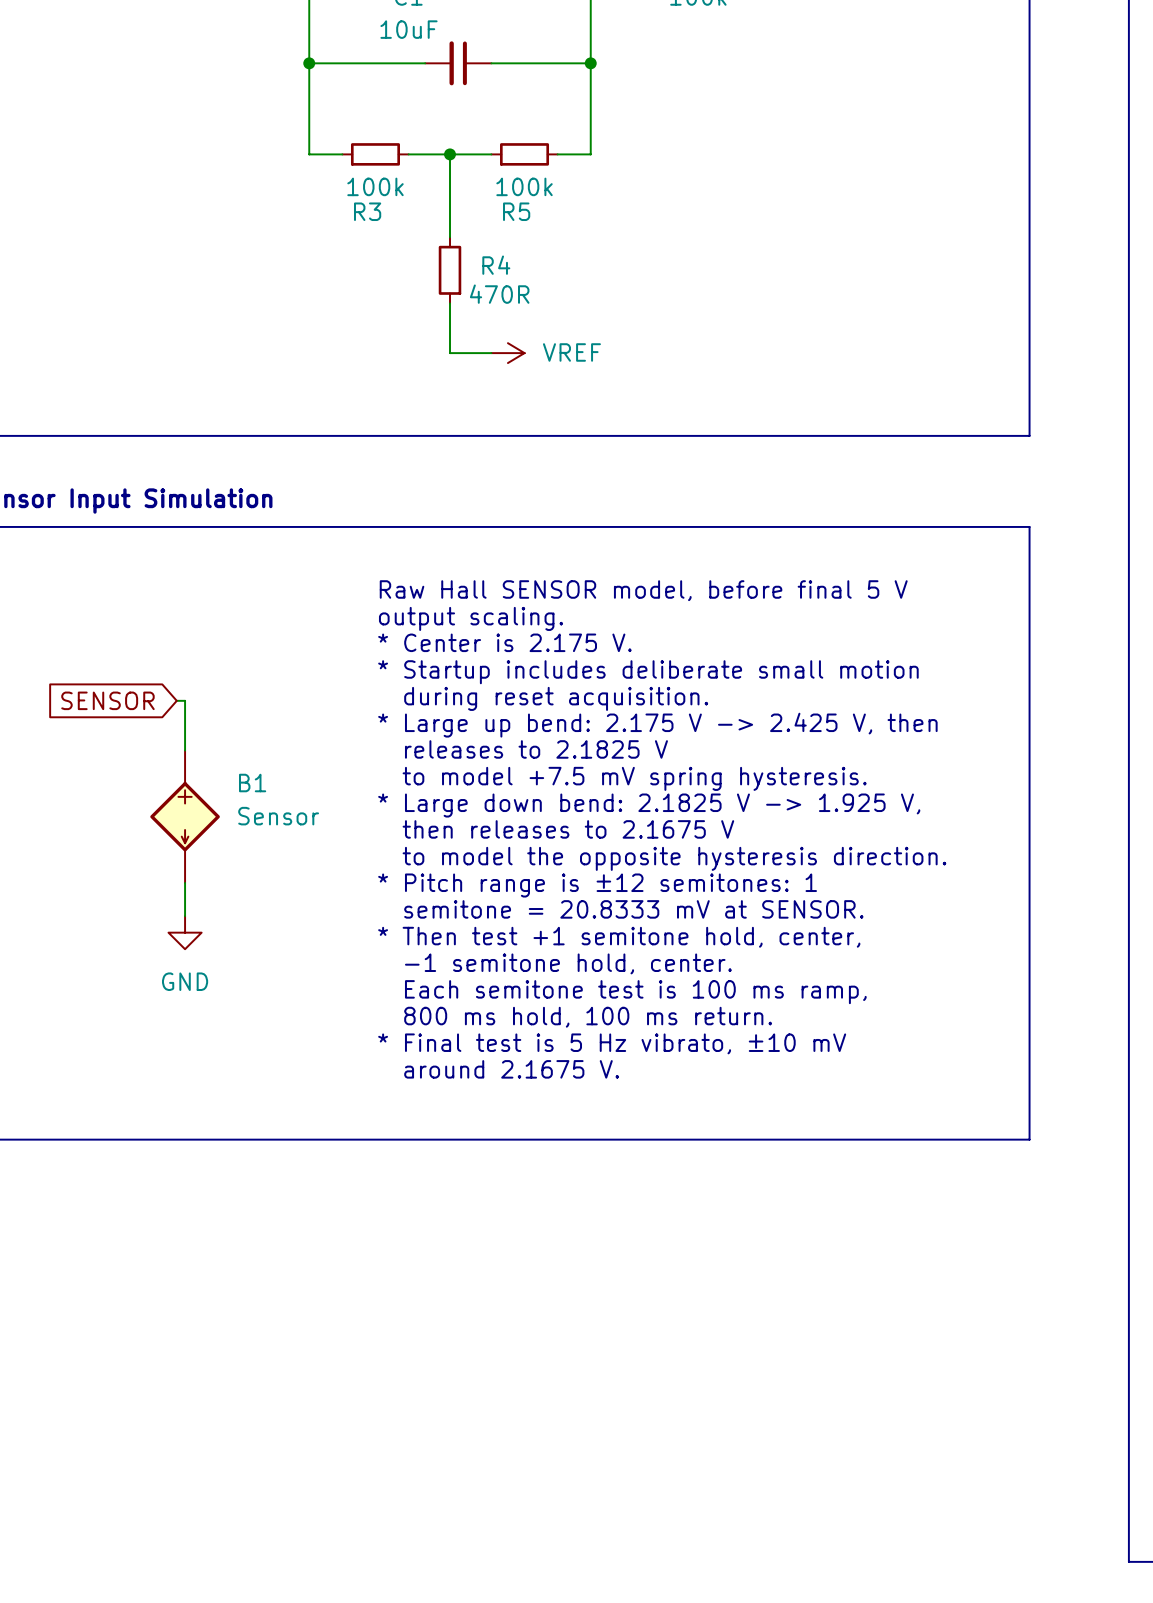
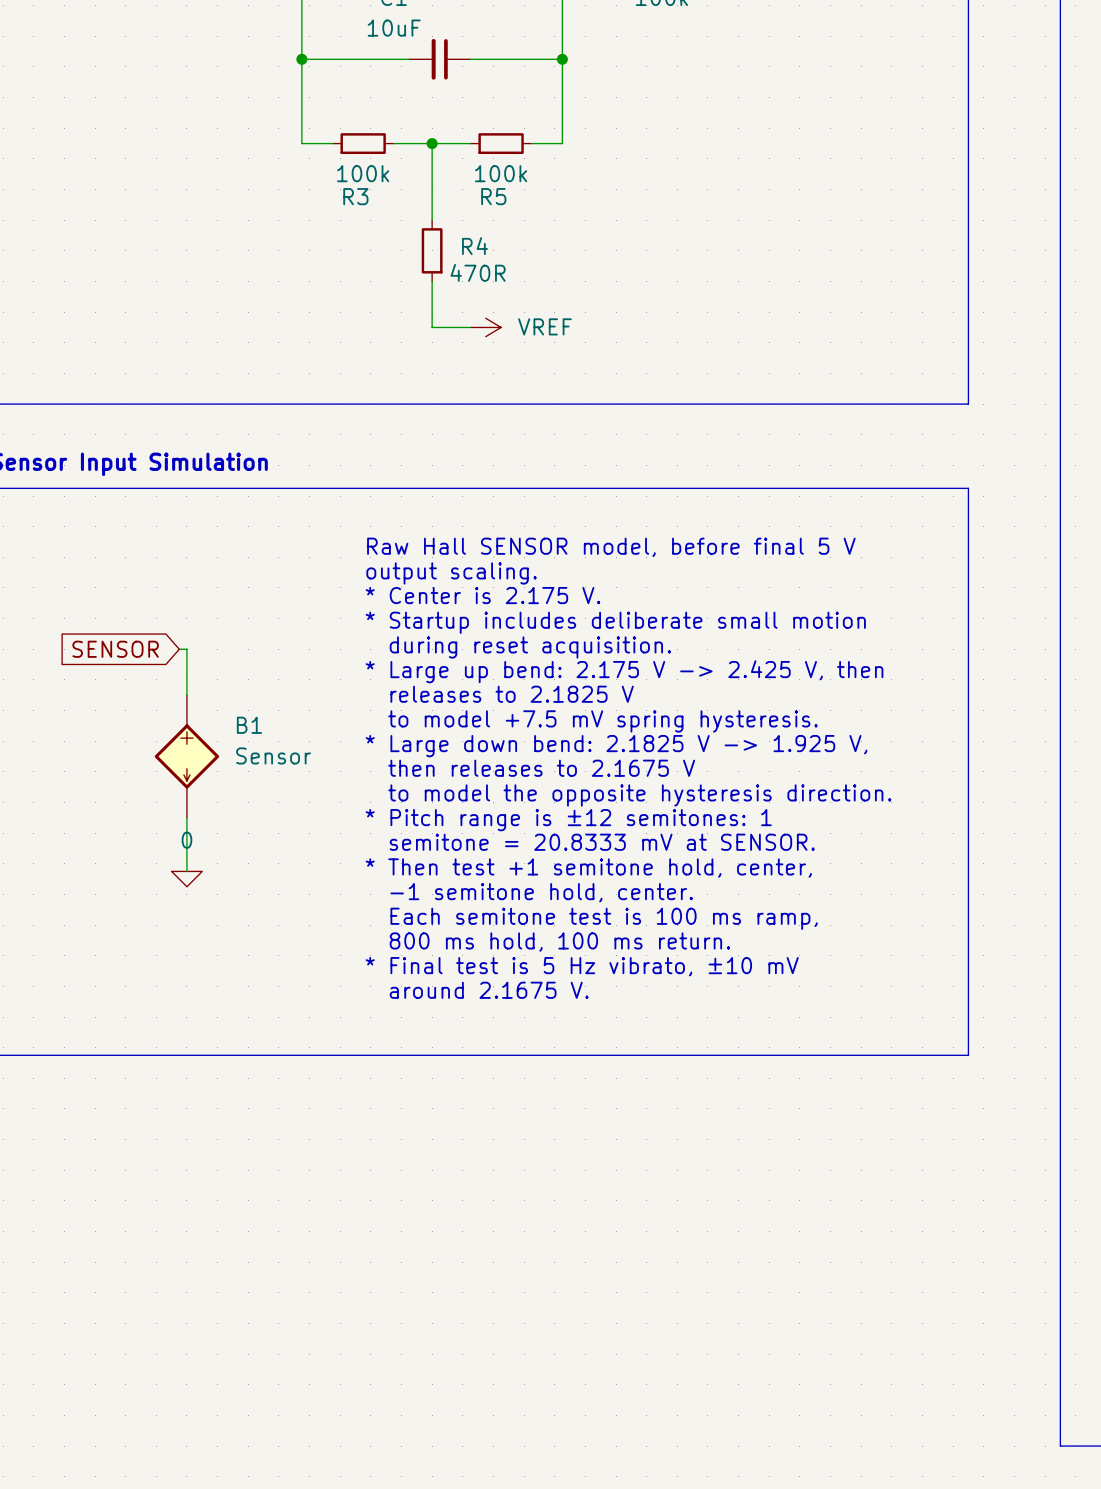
power symbol: GND (185, 932) -> none
power symbol: none -> 0 (186, 879)

